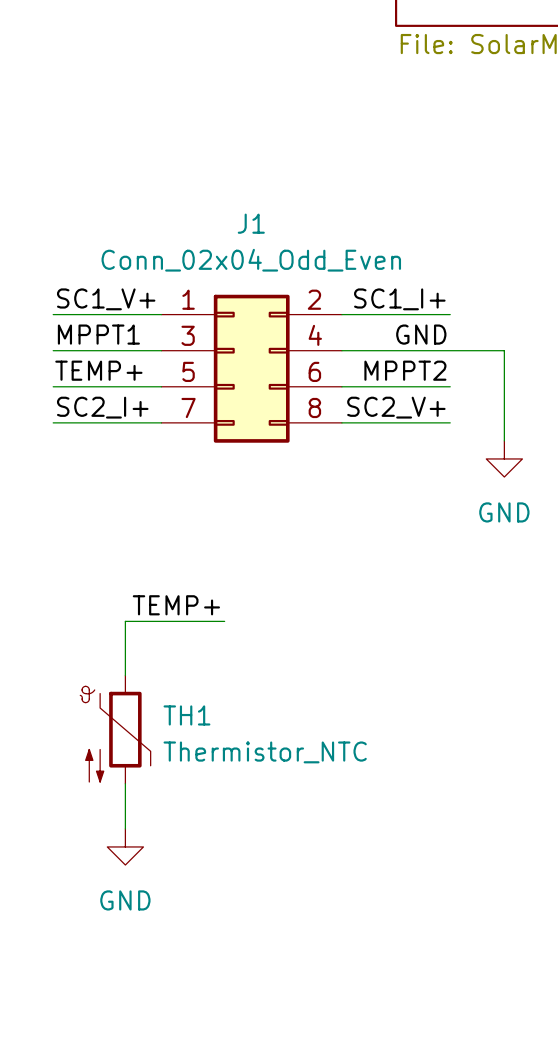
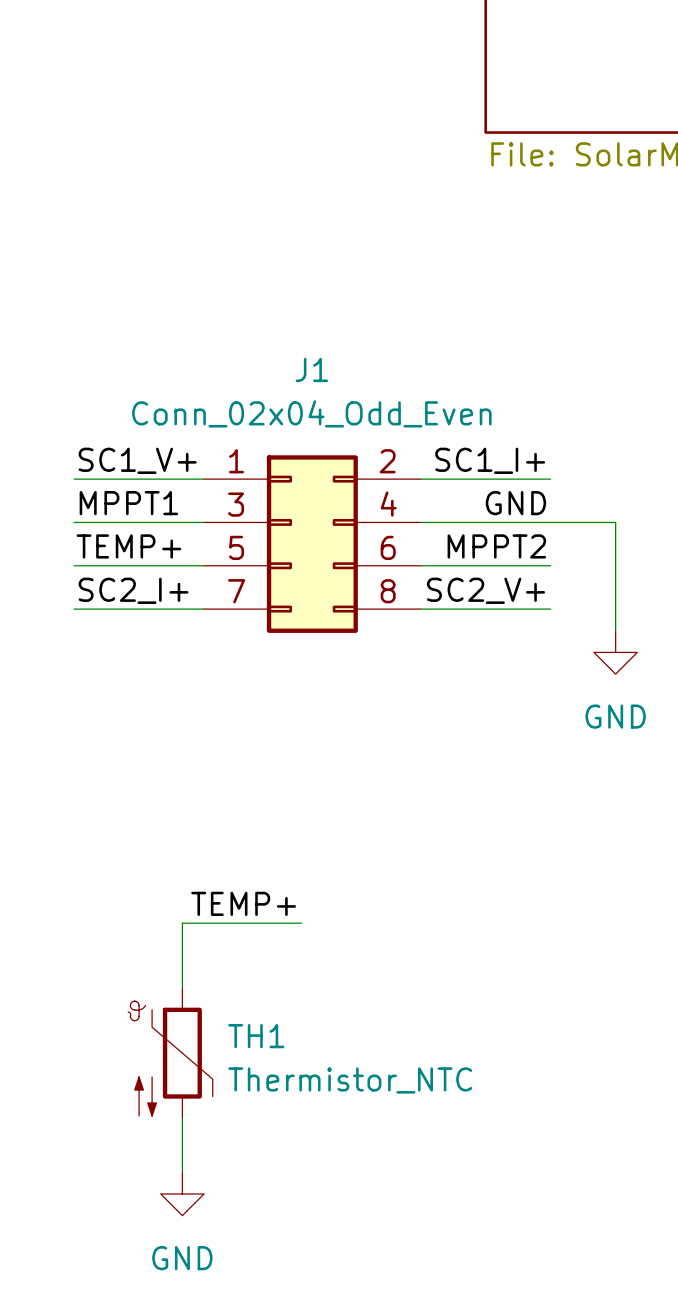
label position: TEMP+ (176, 605) -> TEMP+ (243, 903)
wire: (224, 621) (125, 621) (125, 675) -> (301, 923) (182, 923) (182, 988)
TH1 position: (115, 729) -> (170, 1053)
wire: (125, 783) (125, 828) -> (182, 1118) (182, 1172)
power symbol position: GND (125, 846) -> GND (182, 1193)

